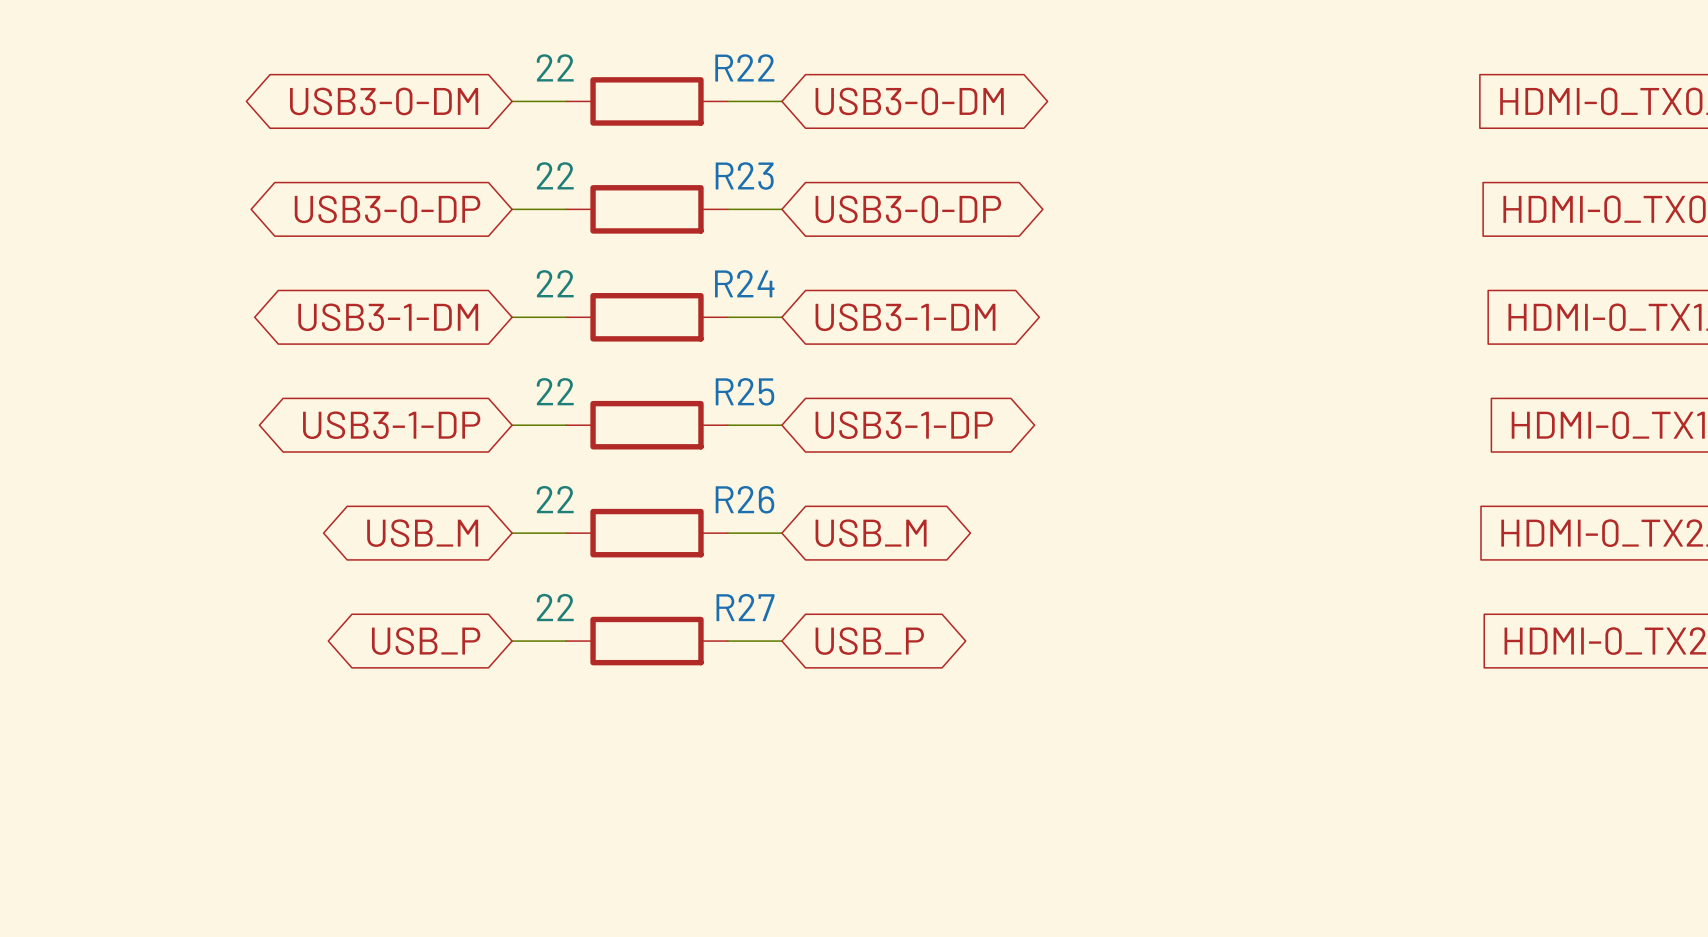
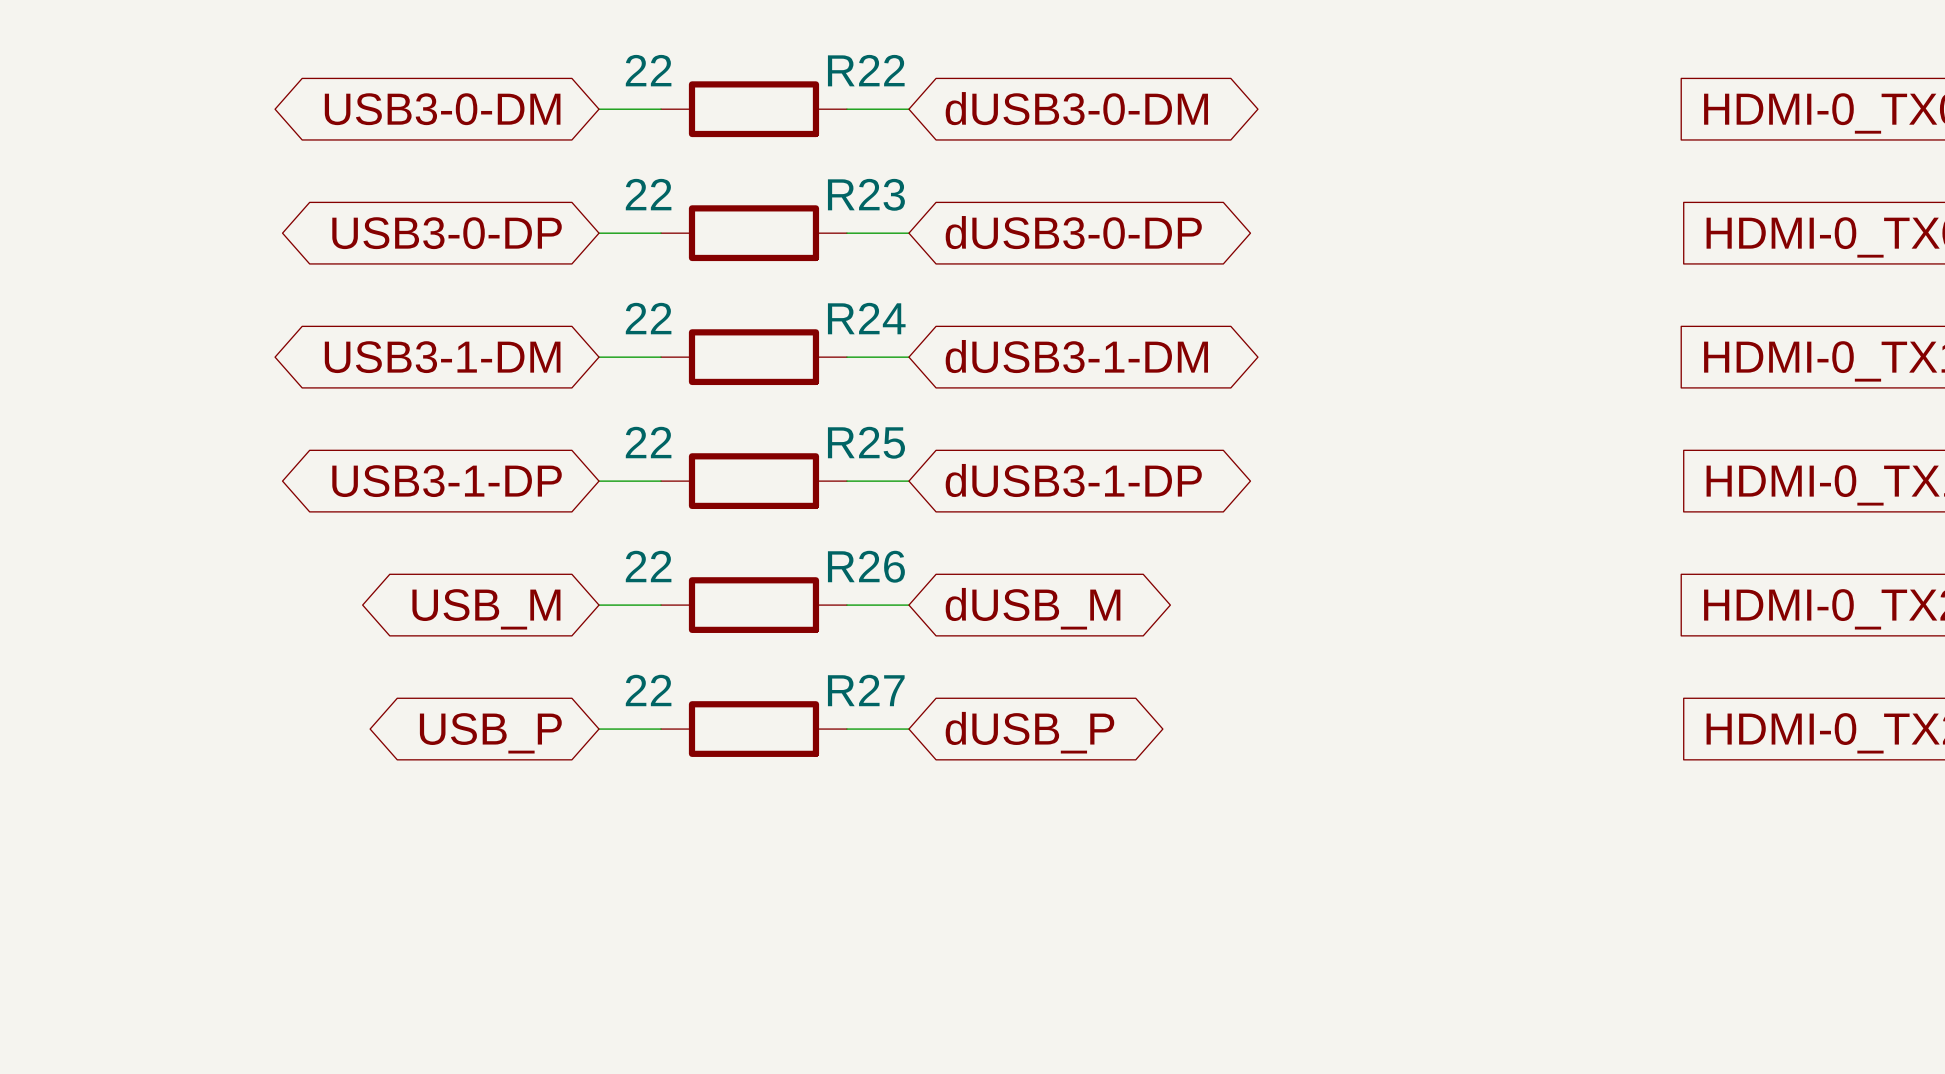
global label: USB3-0-DM (909, 101) -> dUSB3-0-DM (1076, 108)
global label: USB3-0-DP (908, 209) -> dUSB3-0-DP (1073, 232)
global label: USB3-1-DM (905, 317) -> dUSB3-1-DM (1076, 356)
global label: USB3-1-DP (904, 425) -> dUSB3-1-DP (1073, 480)
global label: USB_M (871, 533) -> dUSB_M (1033, 608)
global label: USB_P (869, 641) -> dUSB_P (1029, 732)

